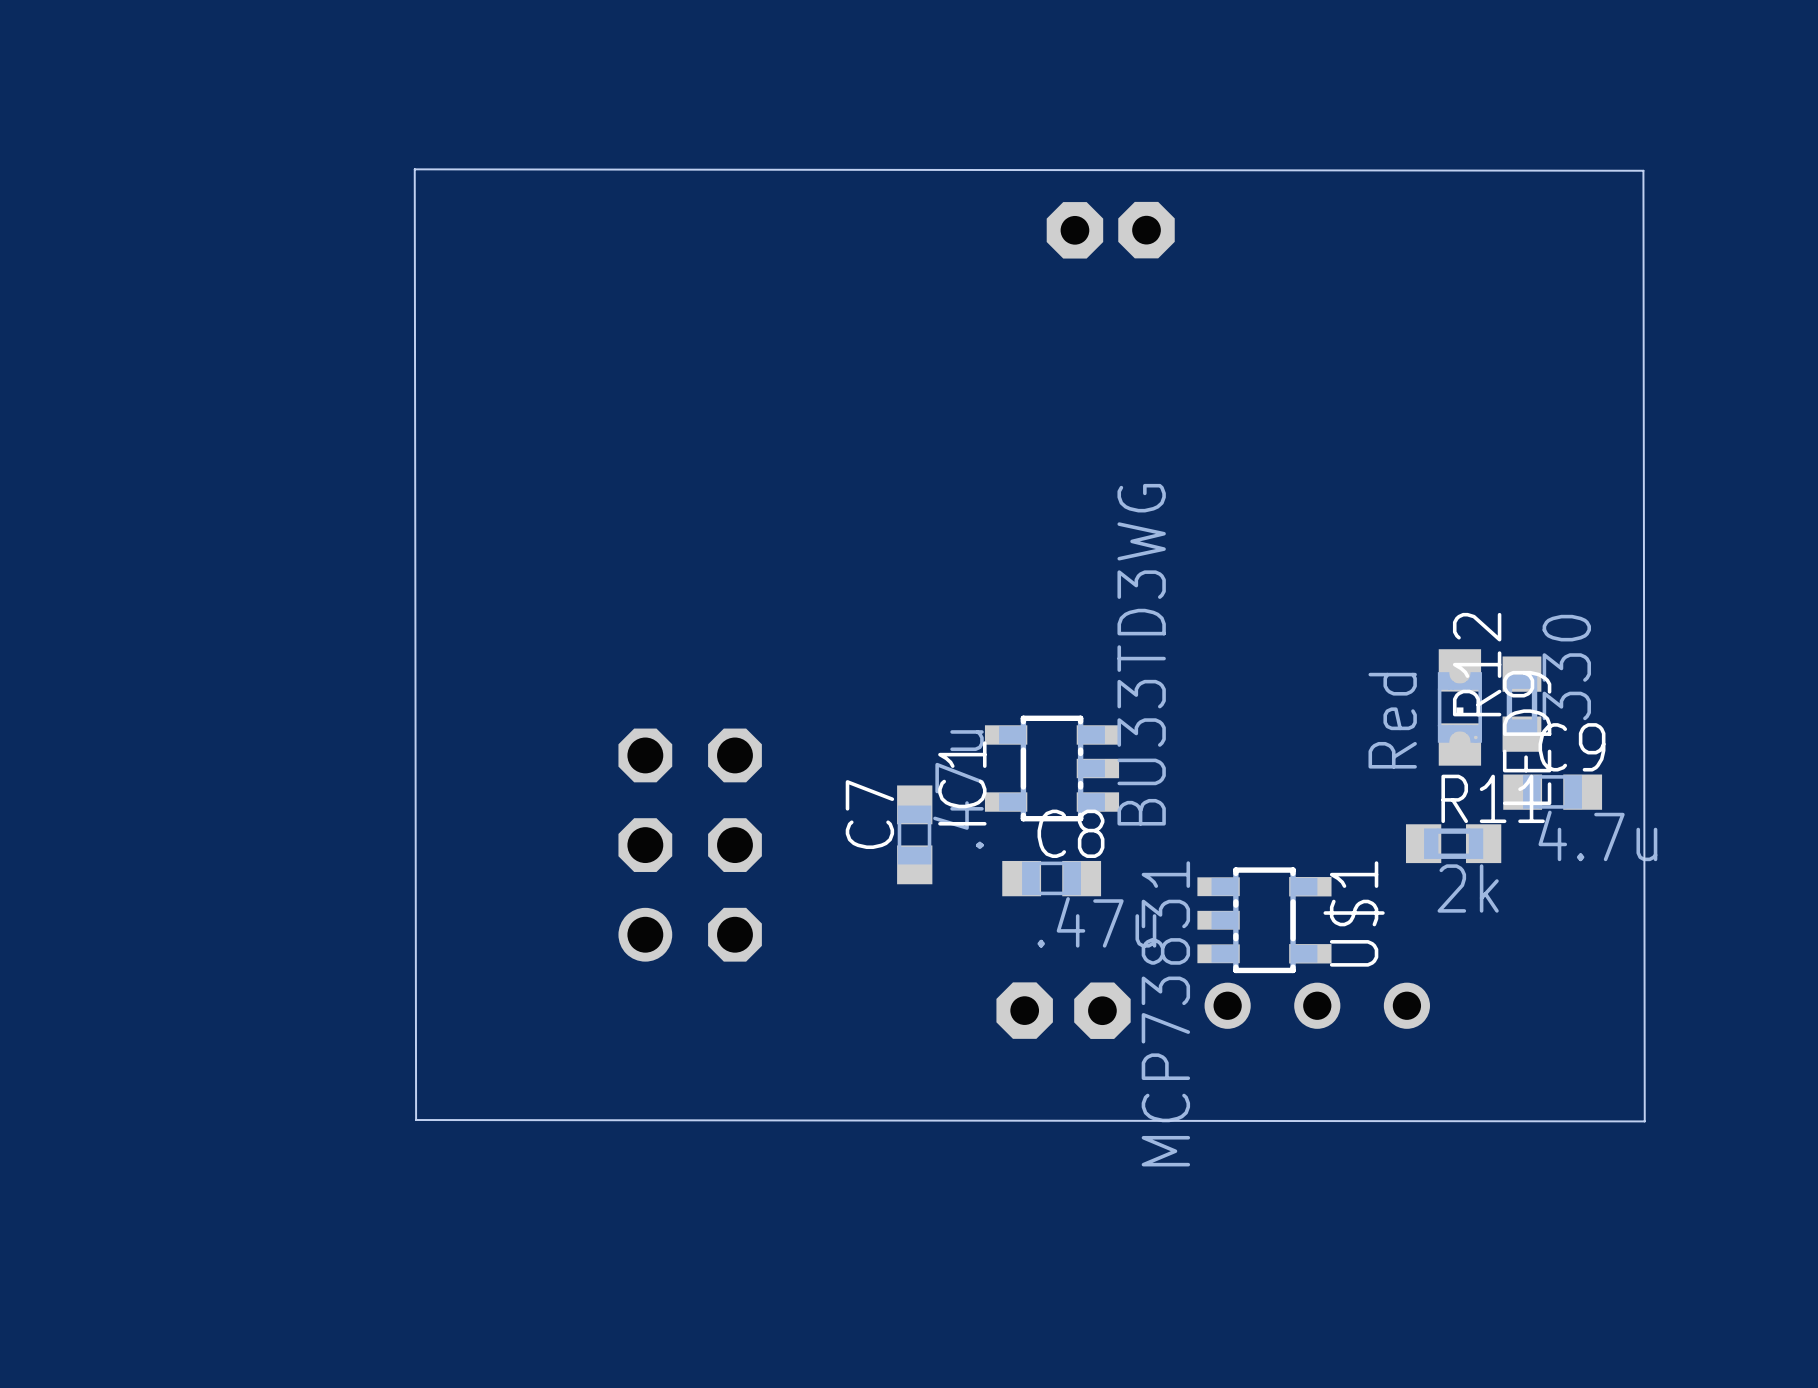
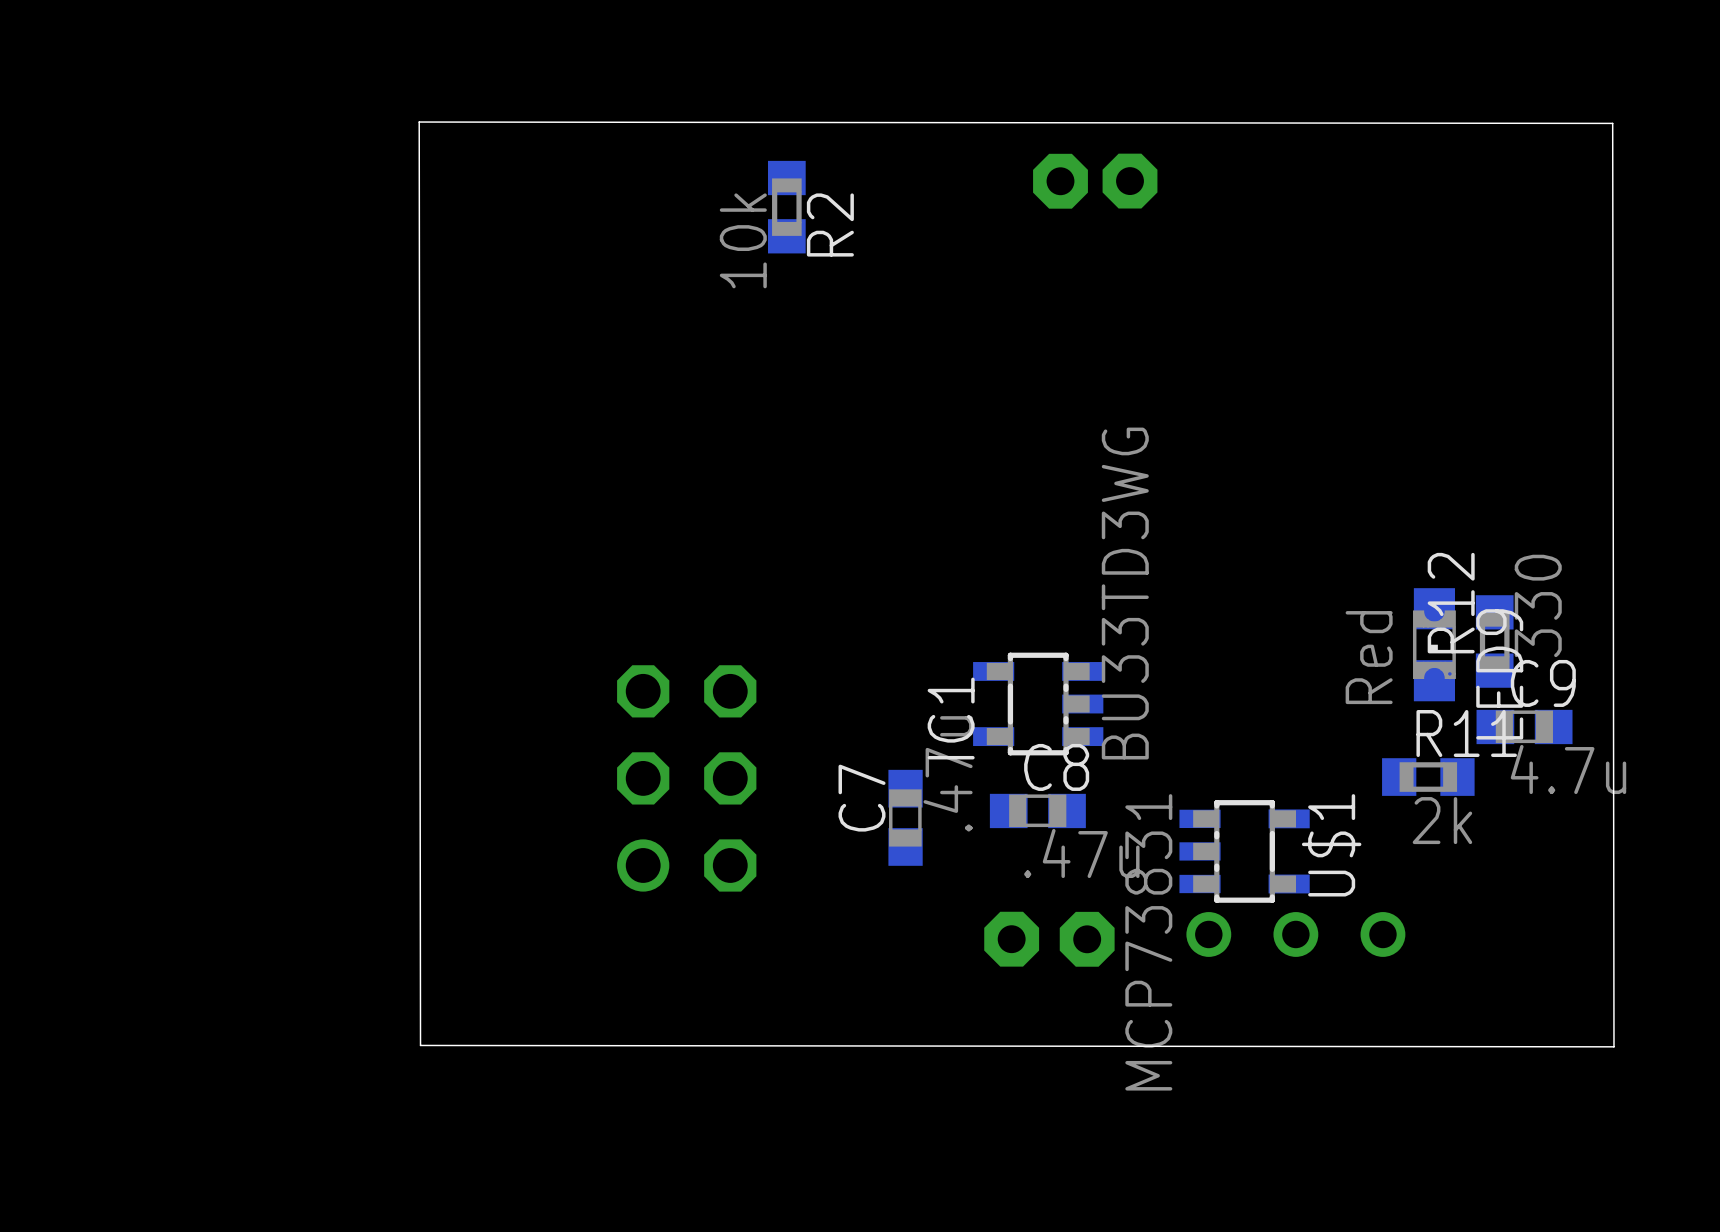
R2: none -> 10k (786, 207)
C7 position: (914, 834) -> (905, 817)

